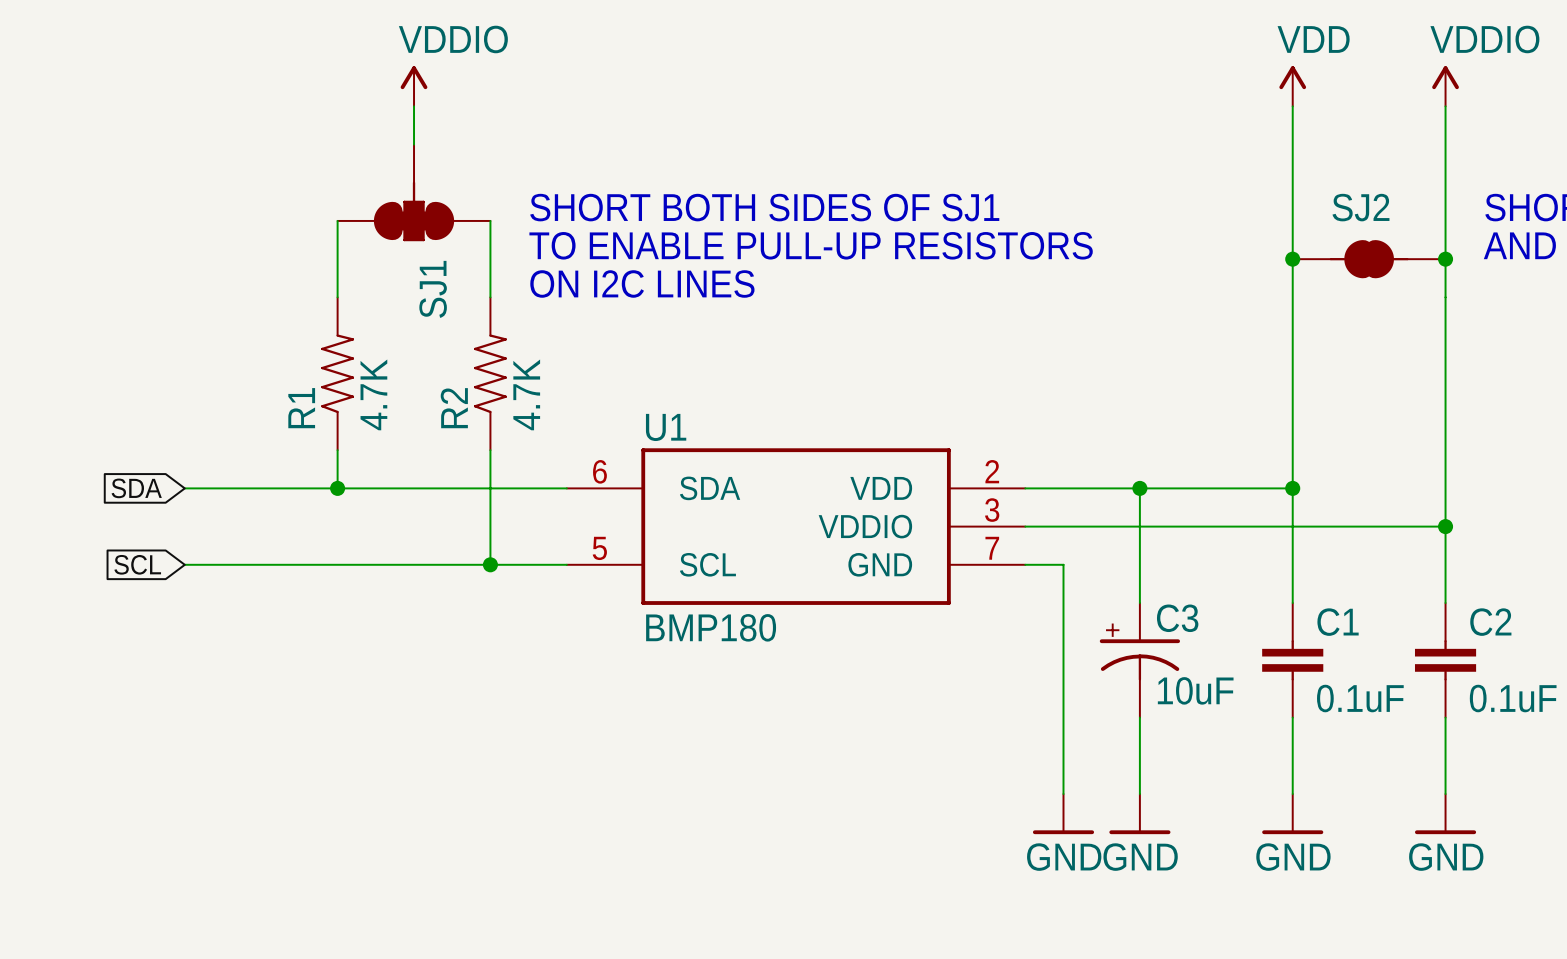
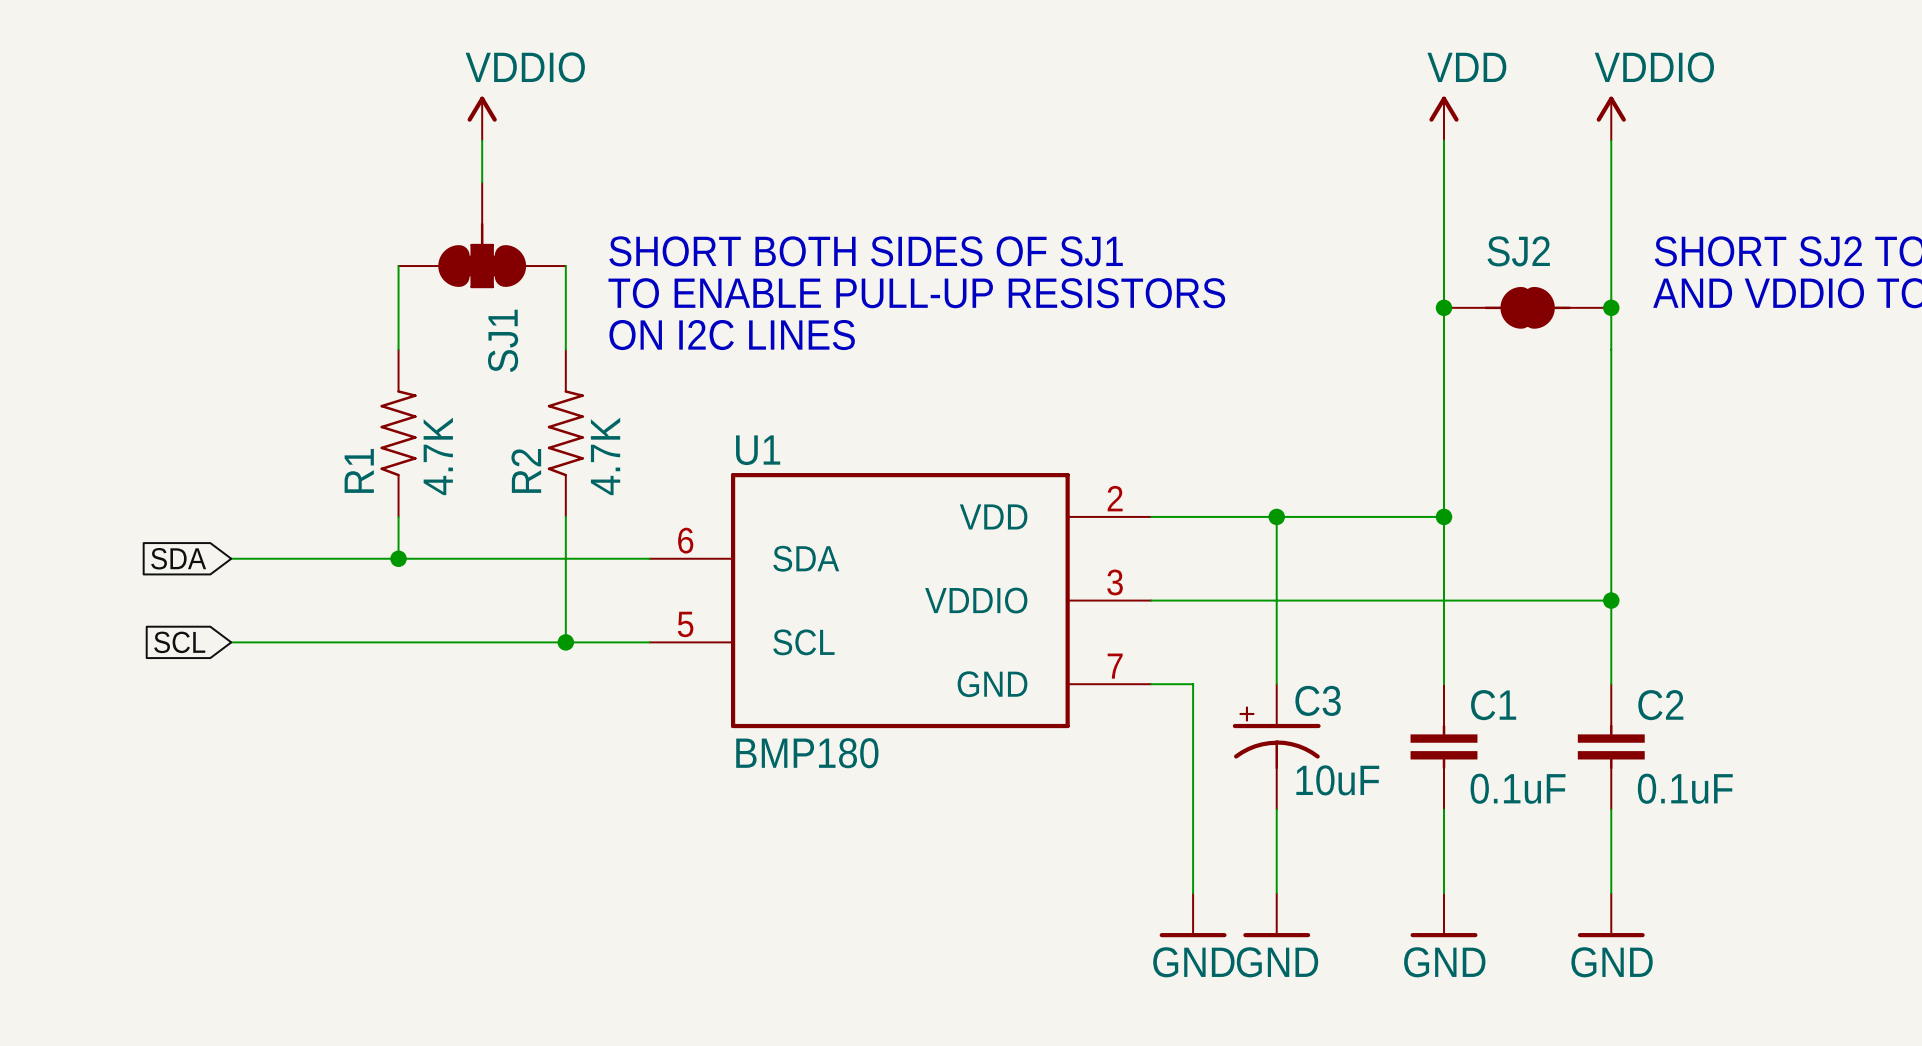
U1 name position: U1 (666, 427) -> U1 (758, 450)
U1 symbol: [566, 448, 1026, 605] -> [649, 473, 1152, 729]
wire: none -> (1276, 516) (1276, 558)
wire: (1025, 488) (1292, 488) -> (1151, 516) (1444, 516)
junction position: (1139, 488) -> (1276, 516)
junction position: (1292, 488) -> (1444, 516)
wire: (1025, 564) (1063, 564) (1063, 603) -> (1151, 684) (1193, 684)
U1 value position: BMP180 (711, 627) -> BMP180 (807, 753)

